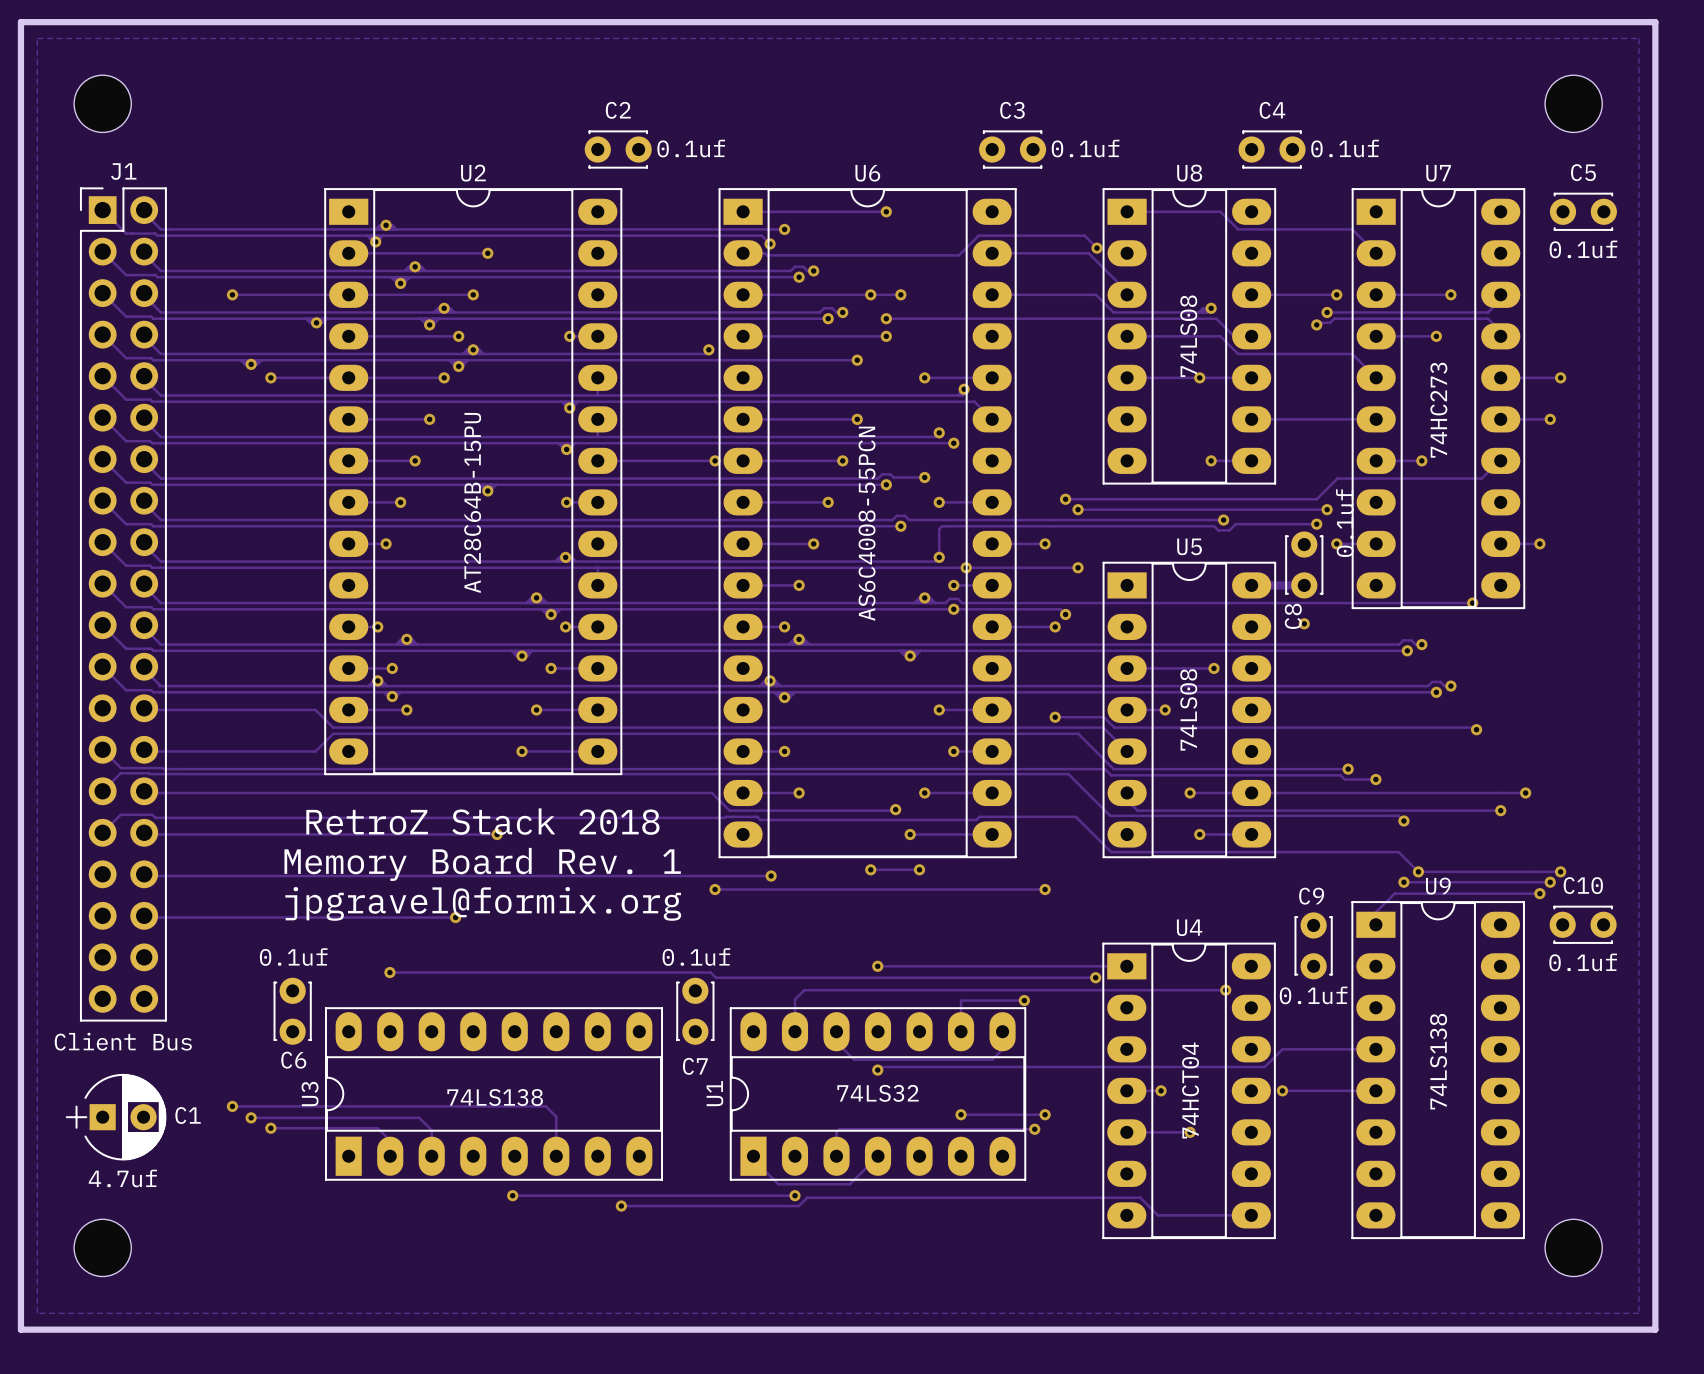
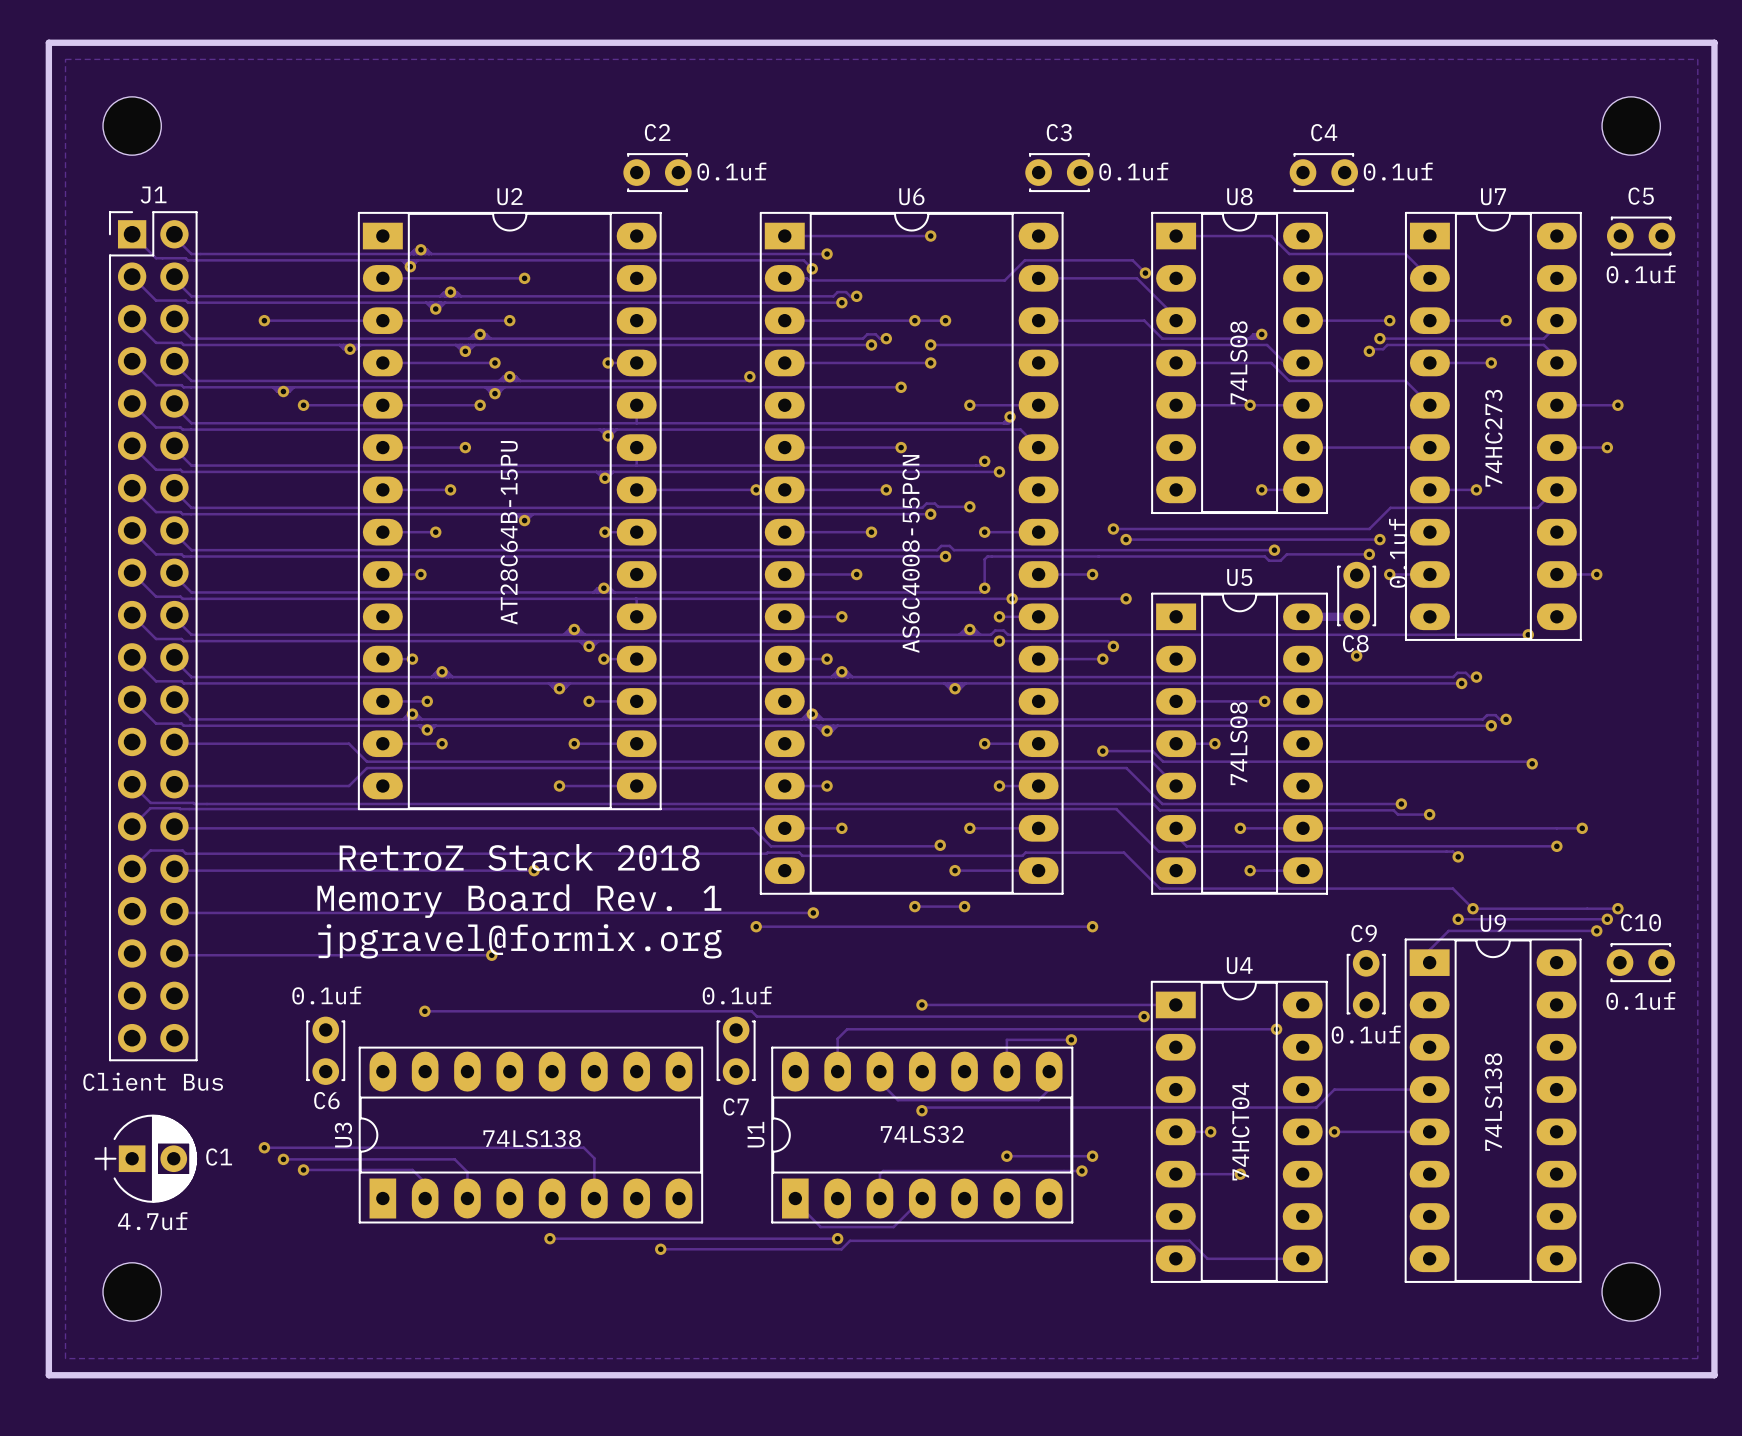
C8 name rotation: 0° (1293, 616) -> 90° clockwise (1355, 643)

